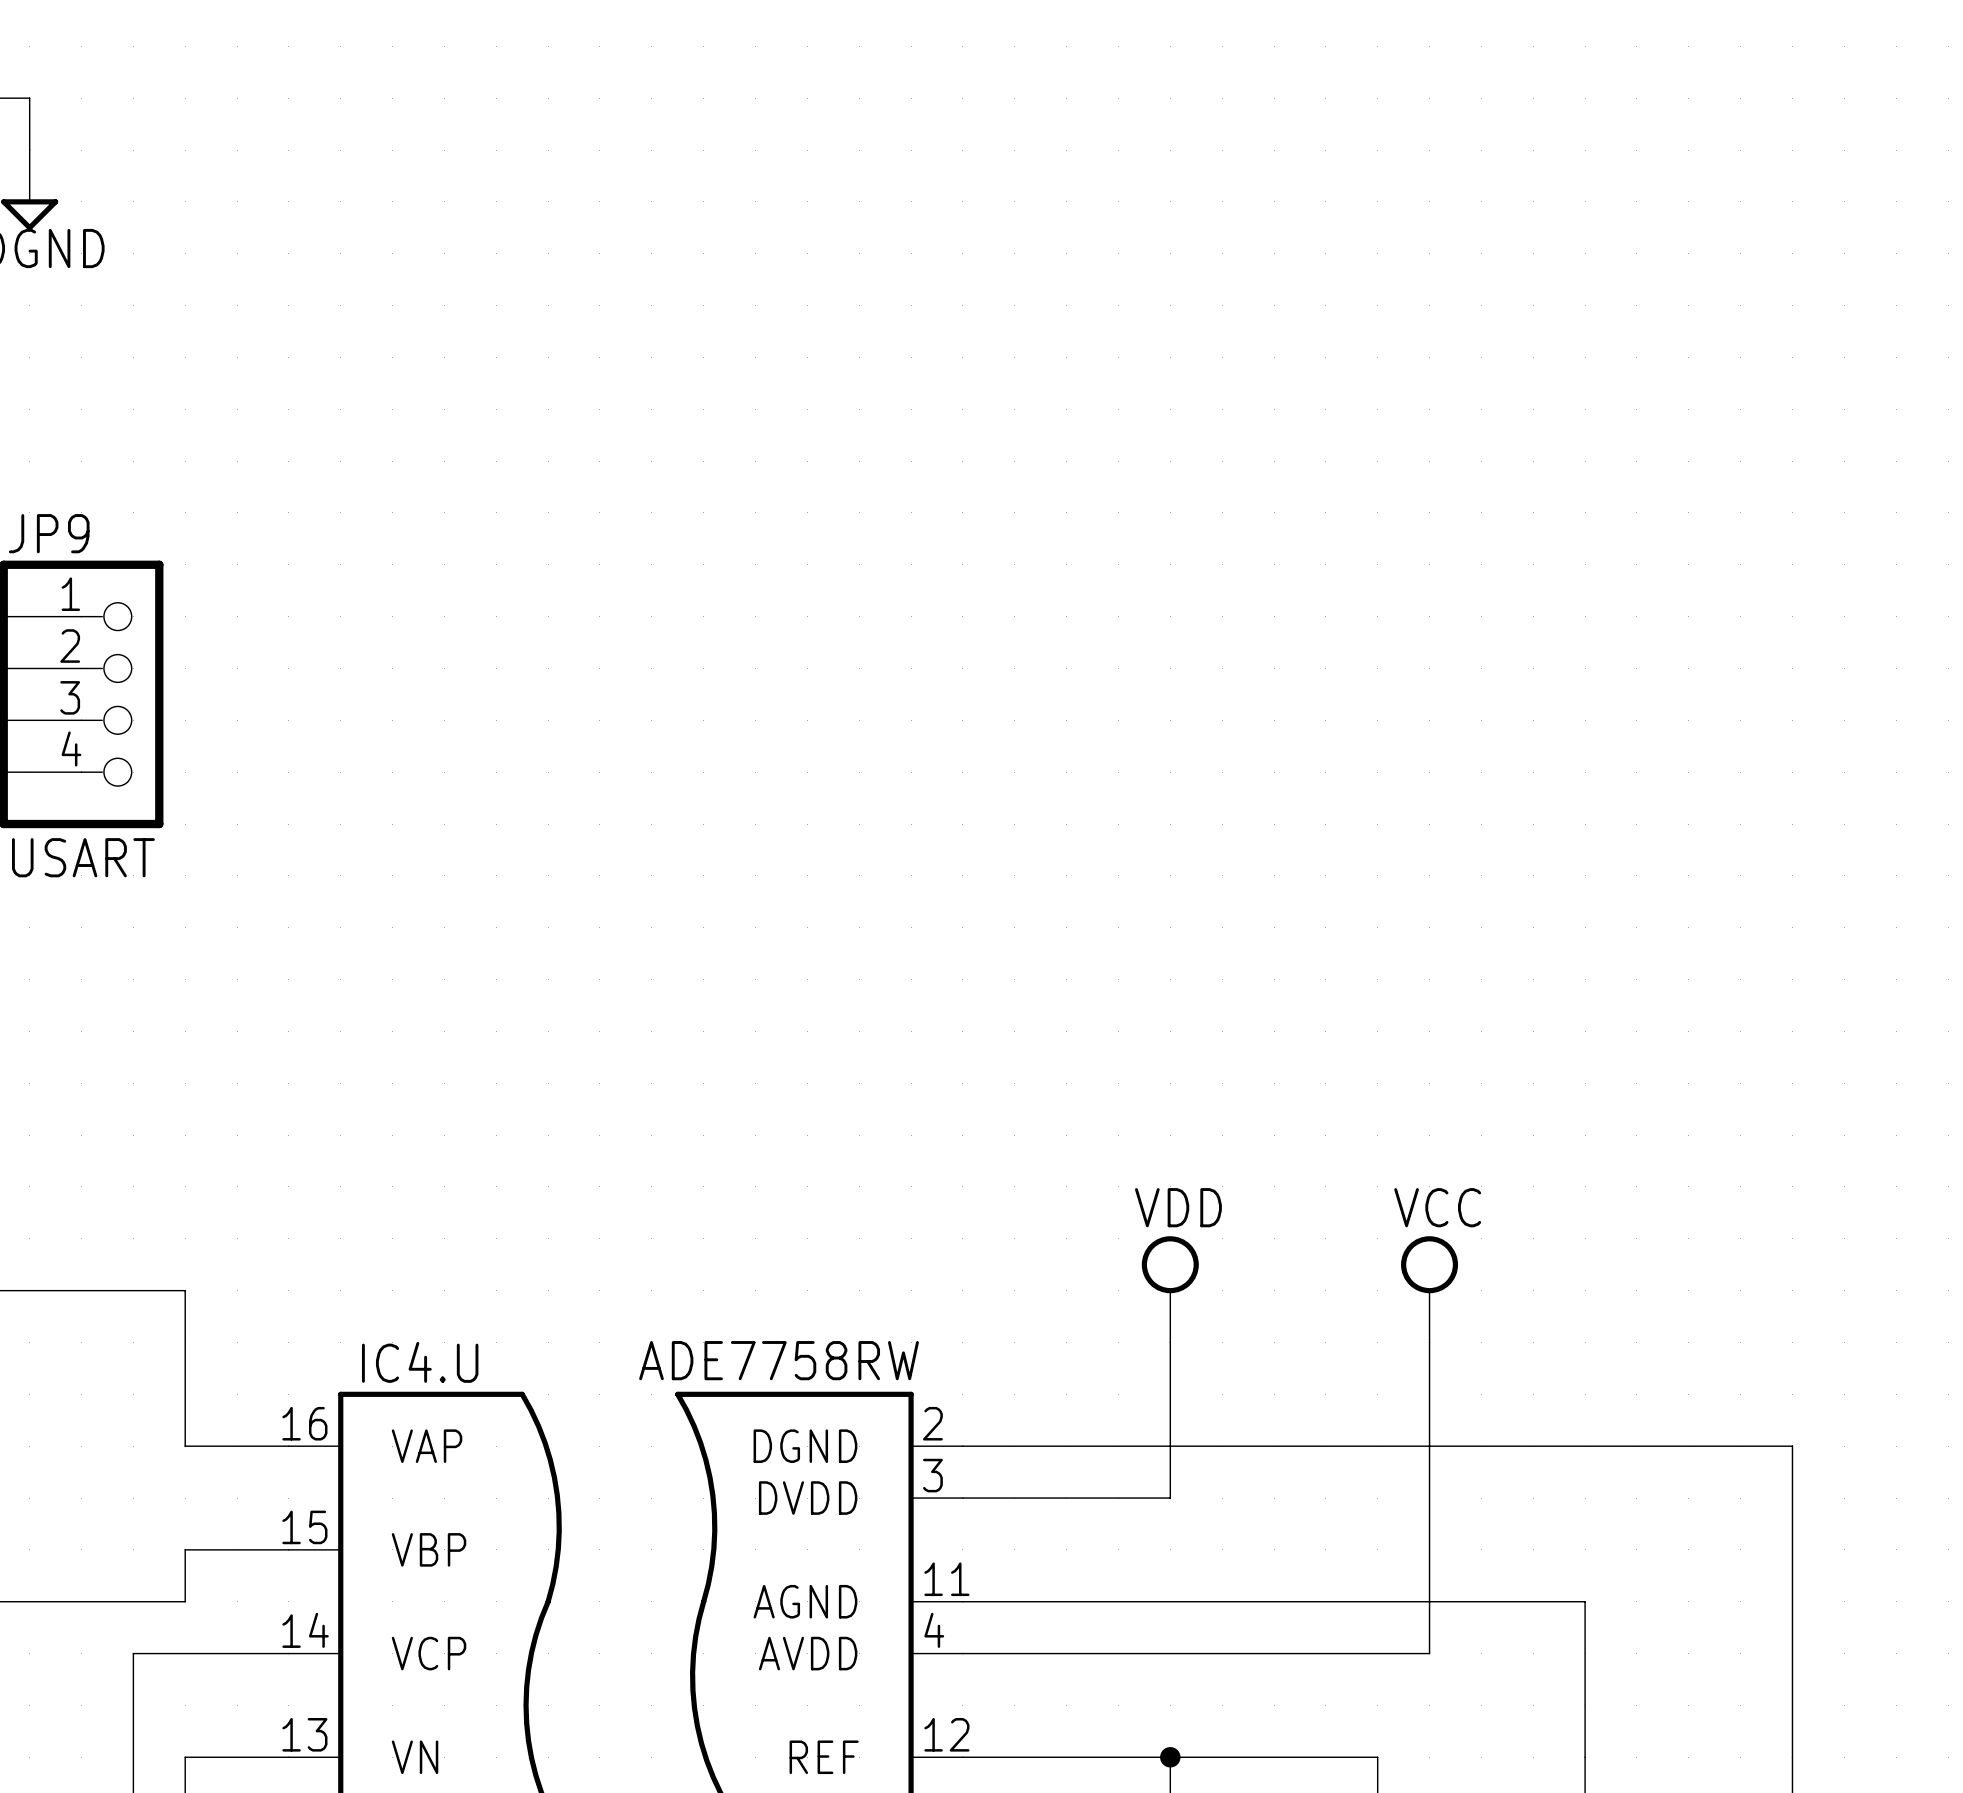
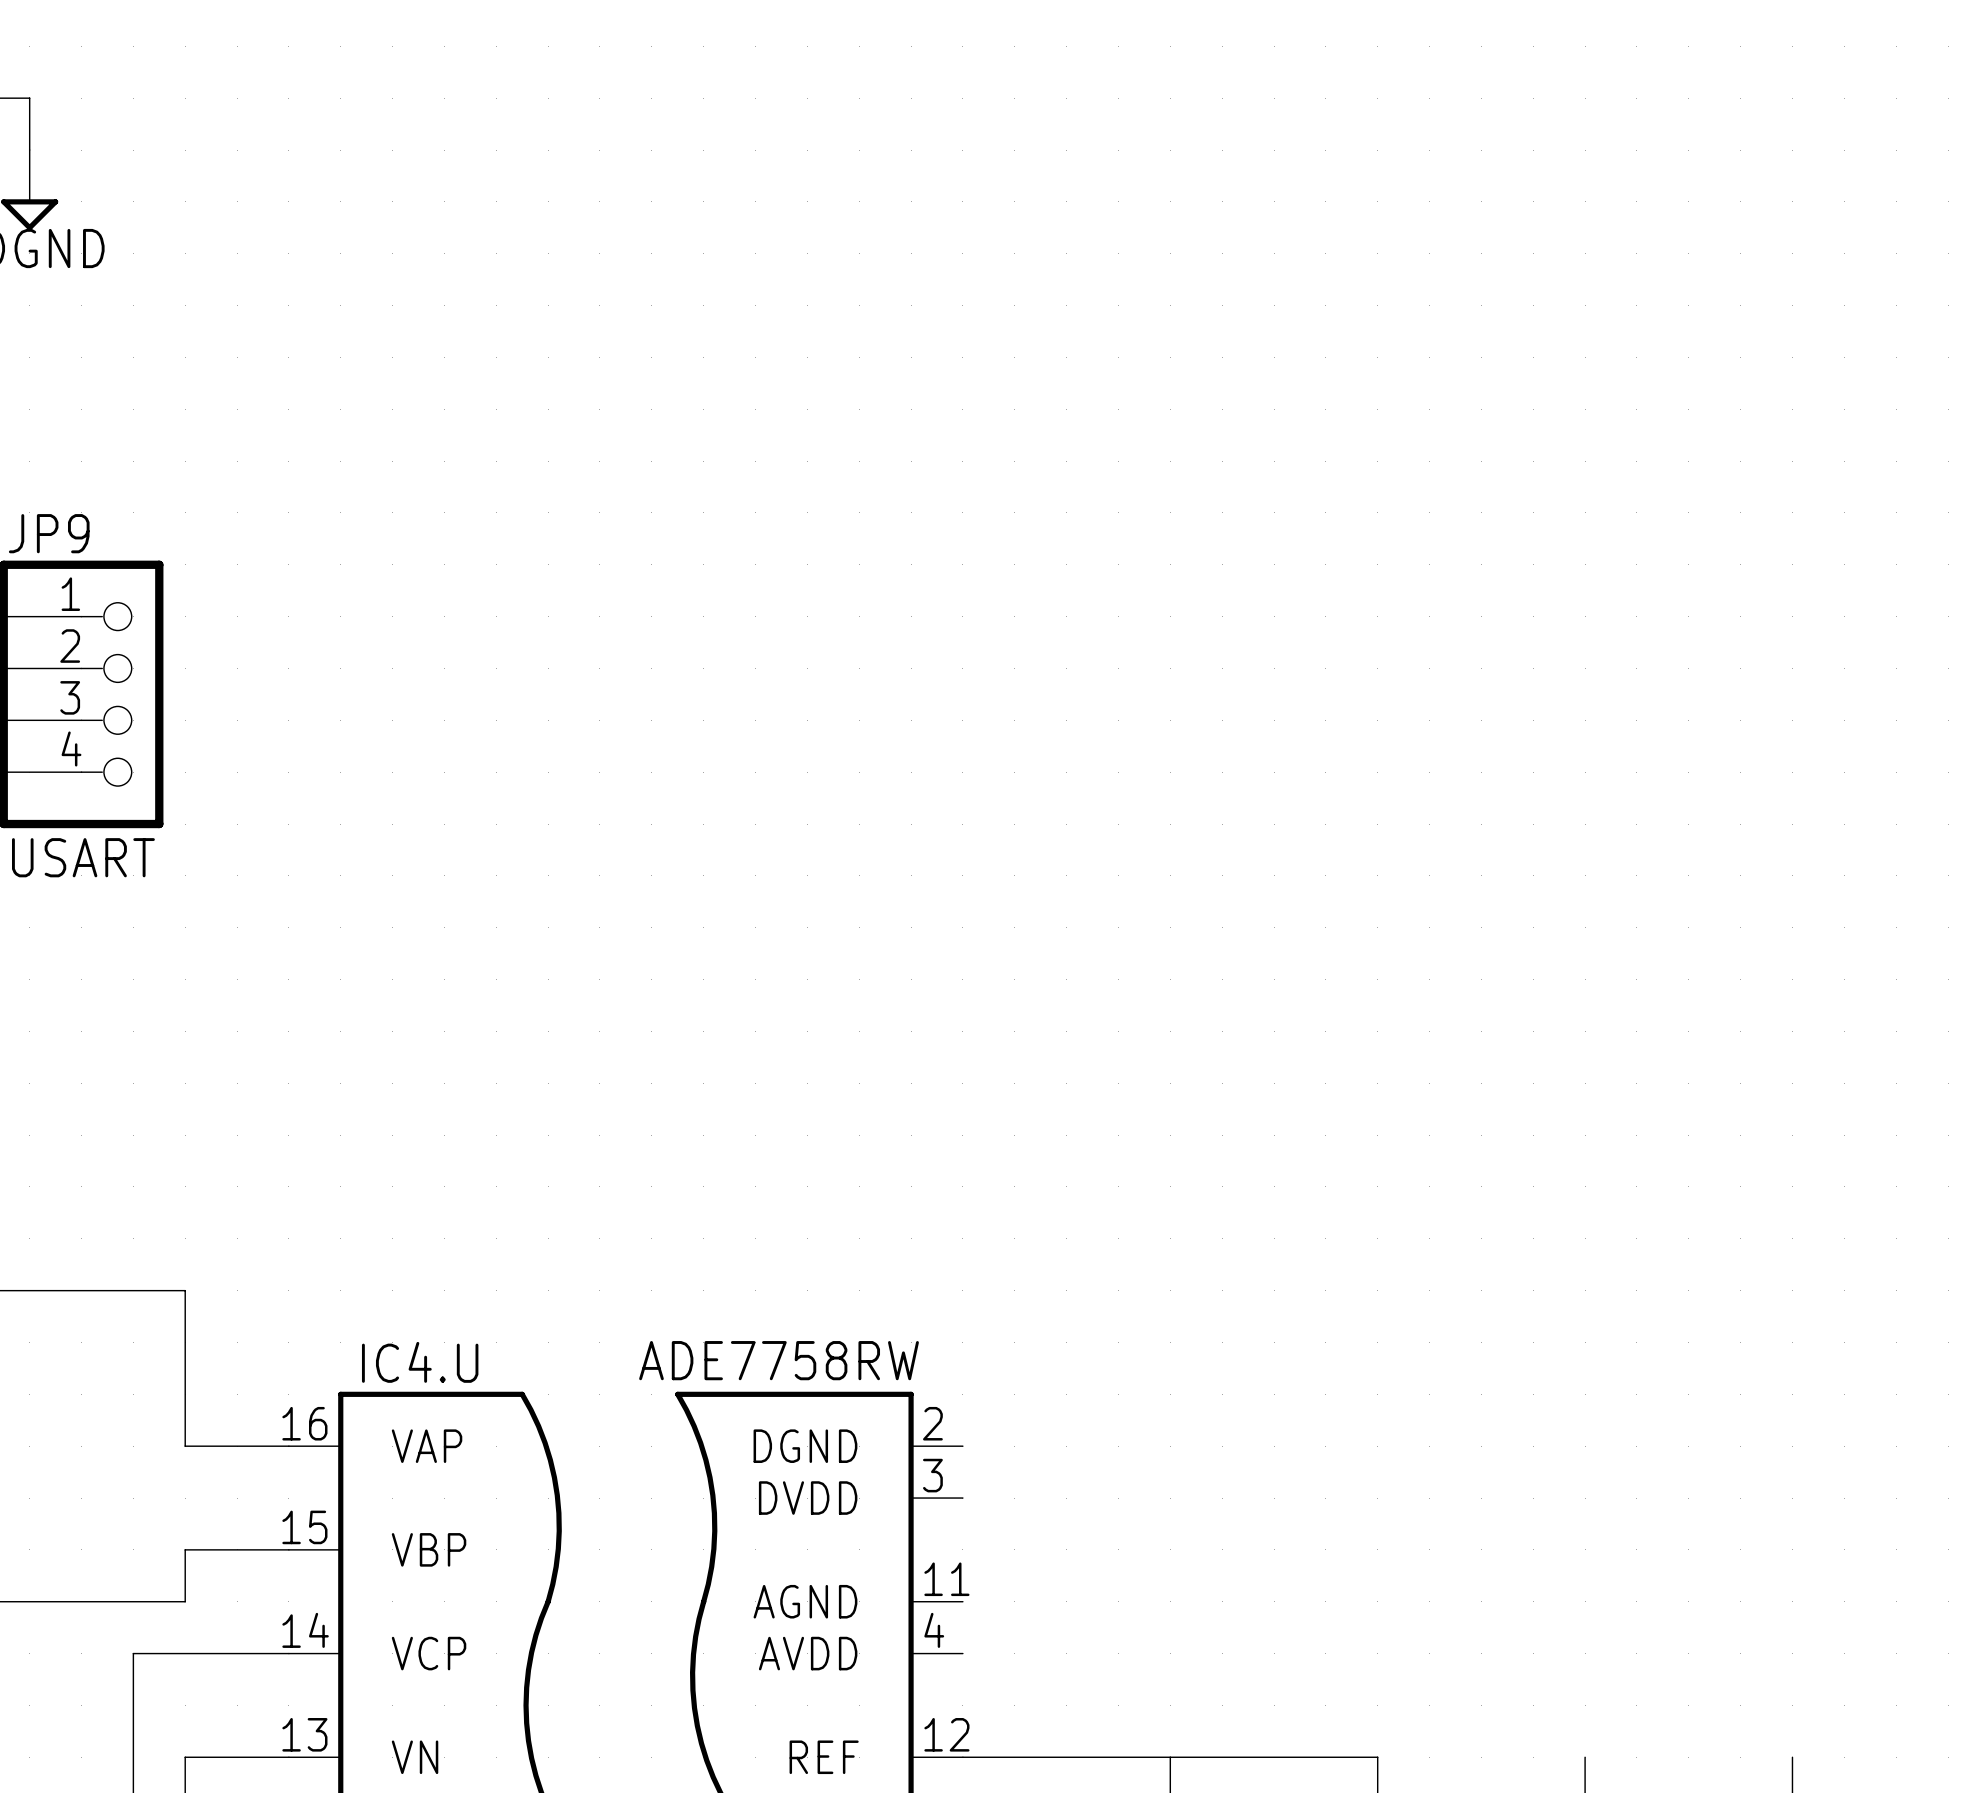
power symbol: VDD (1170, 1289) -> none
power symbol: VCC (1429, 1289) -> none
wire: (1170, 1342) (1170, 1498) (962, 1498) -> none
wire: (1429, 1342) (1429, 1653) (962, 1653) -> none
wire: (962, 1446) (1792, 1446) (1792, 1757) -> none
wire: (962, 1601) (1585, 1601) (1585, 1757) -> none
junction: (1170, 1757) -> none

